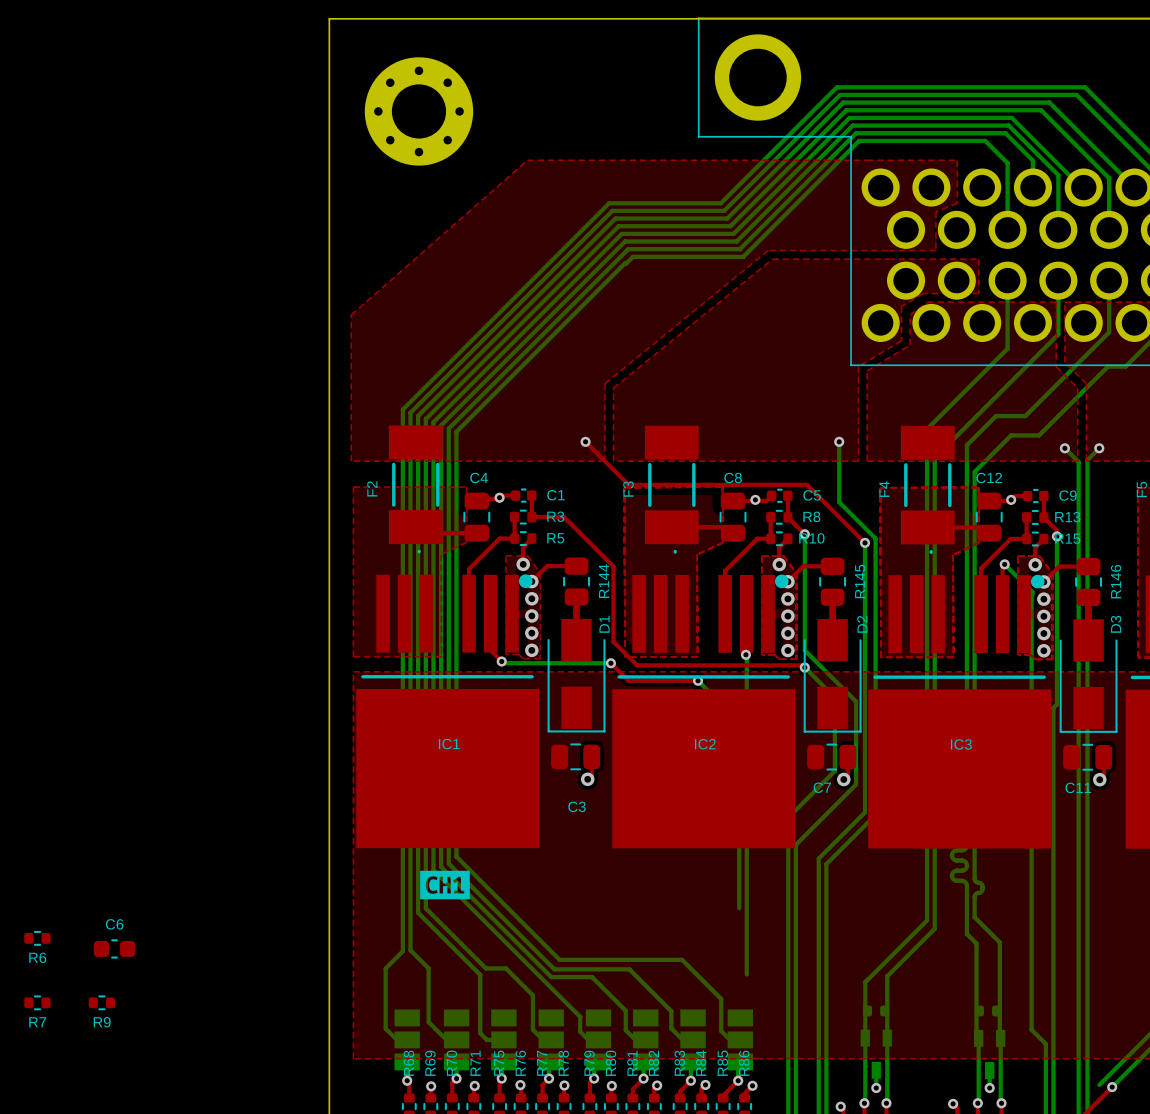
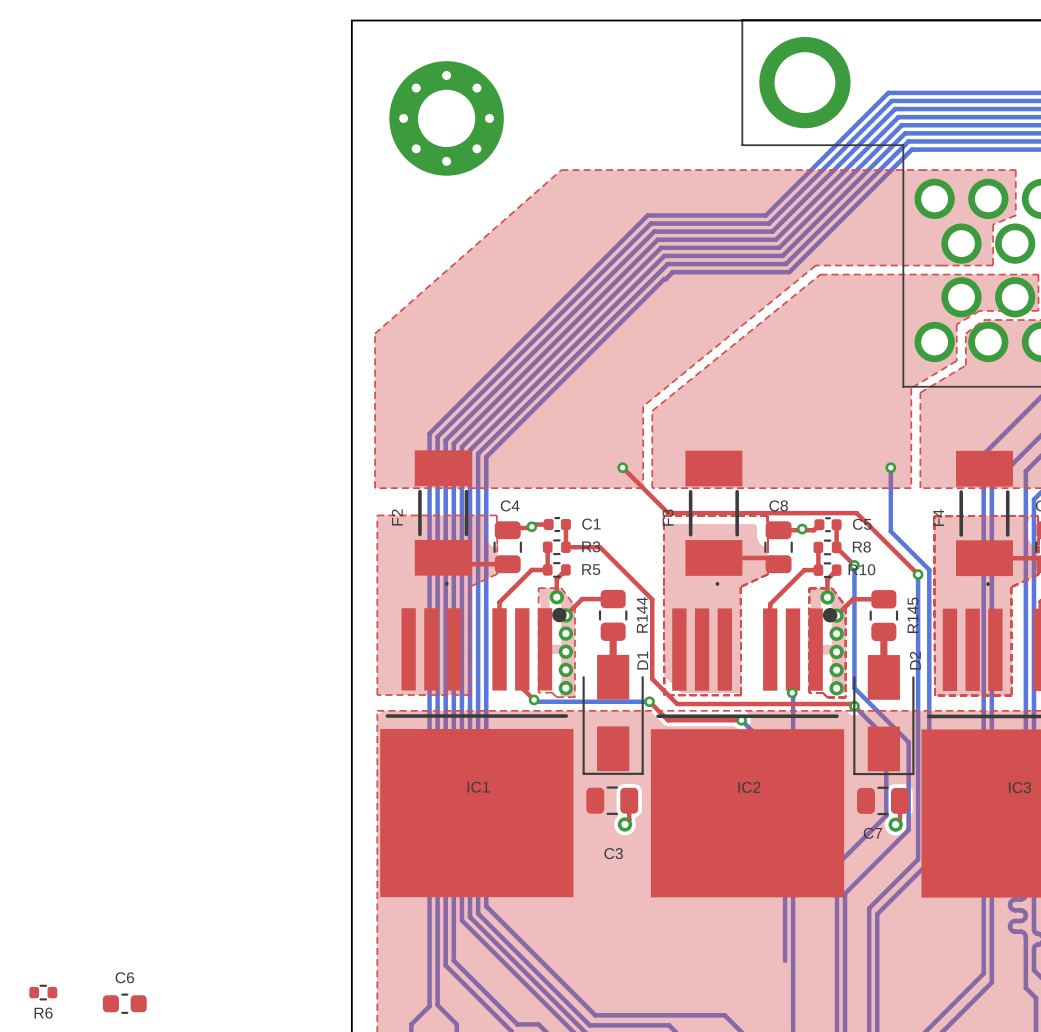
drawing: [420, 870, 470, 900] -> none

